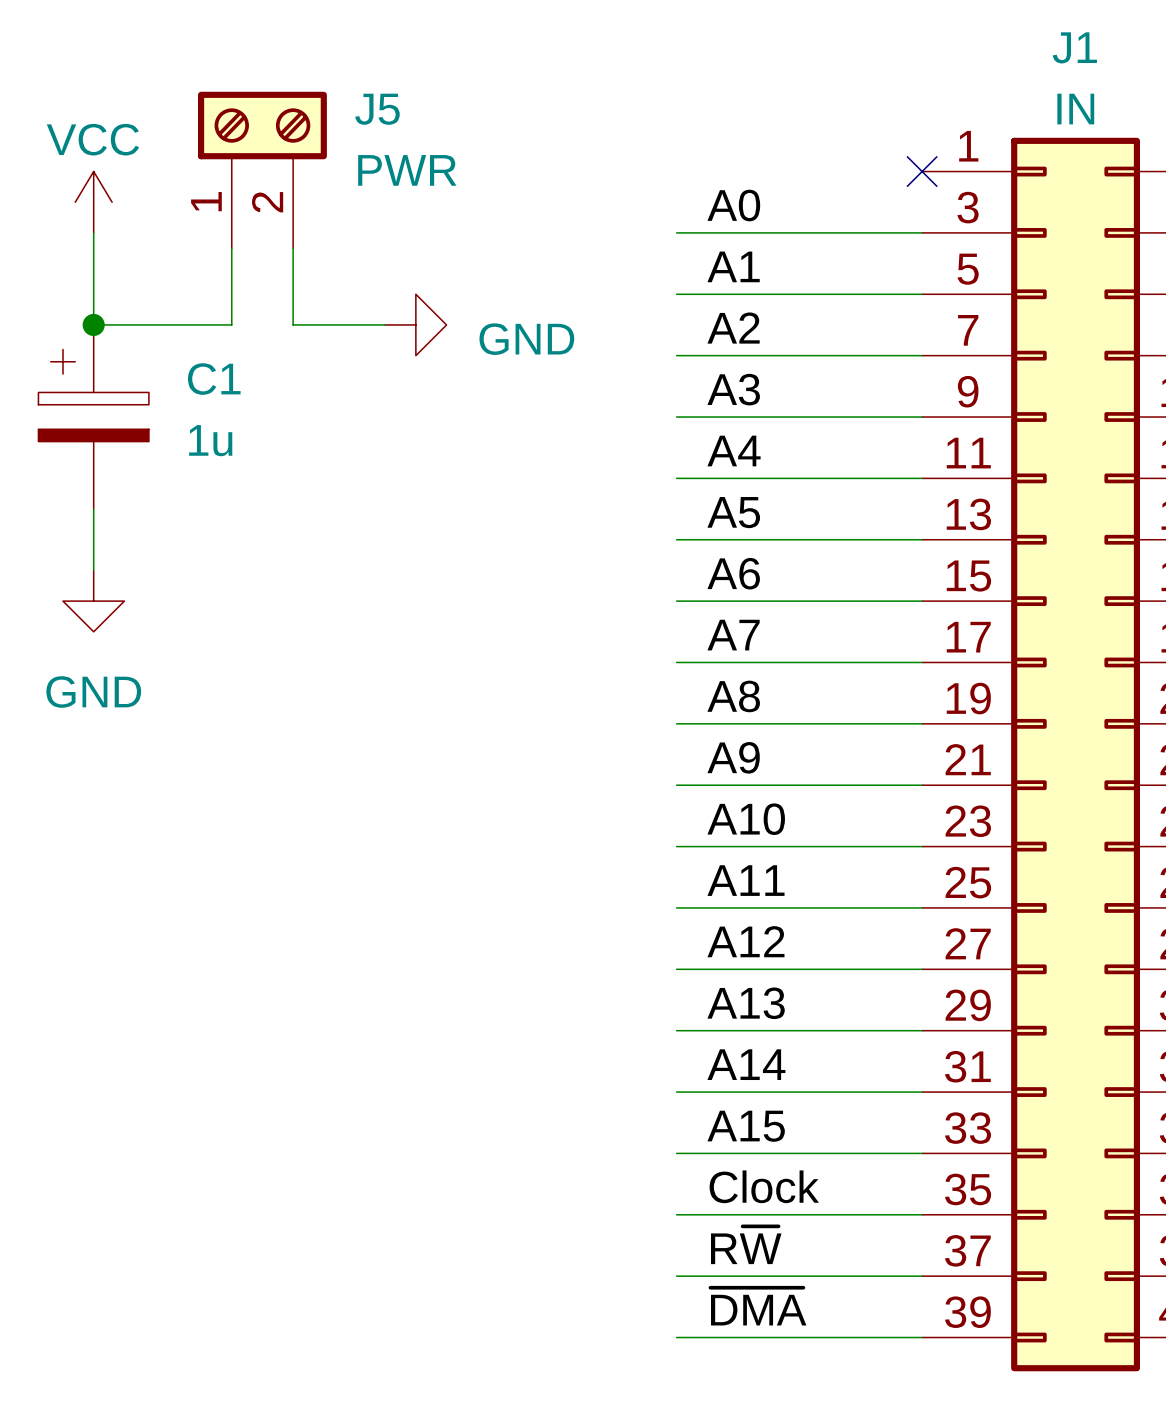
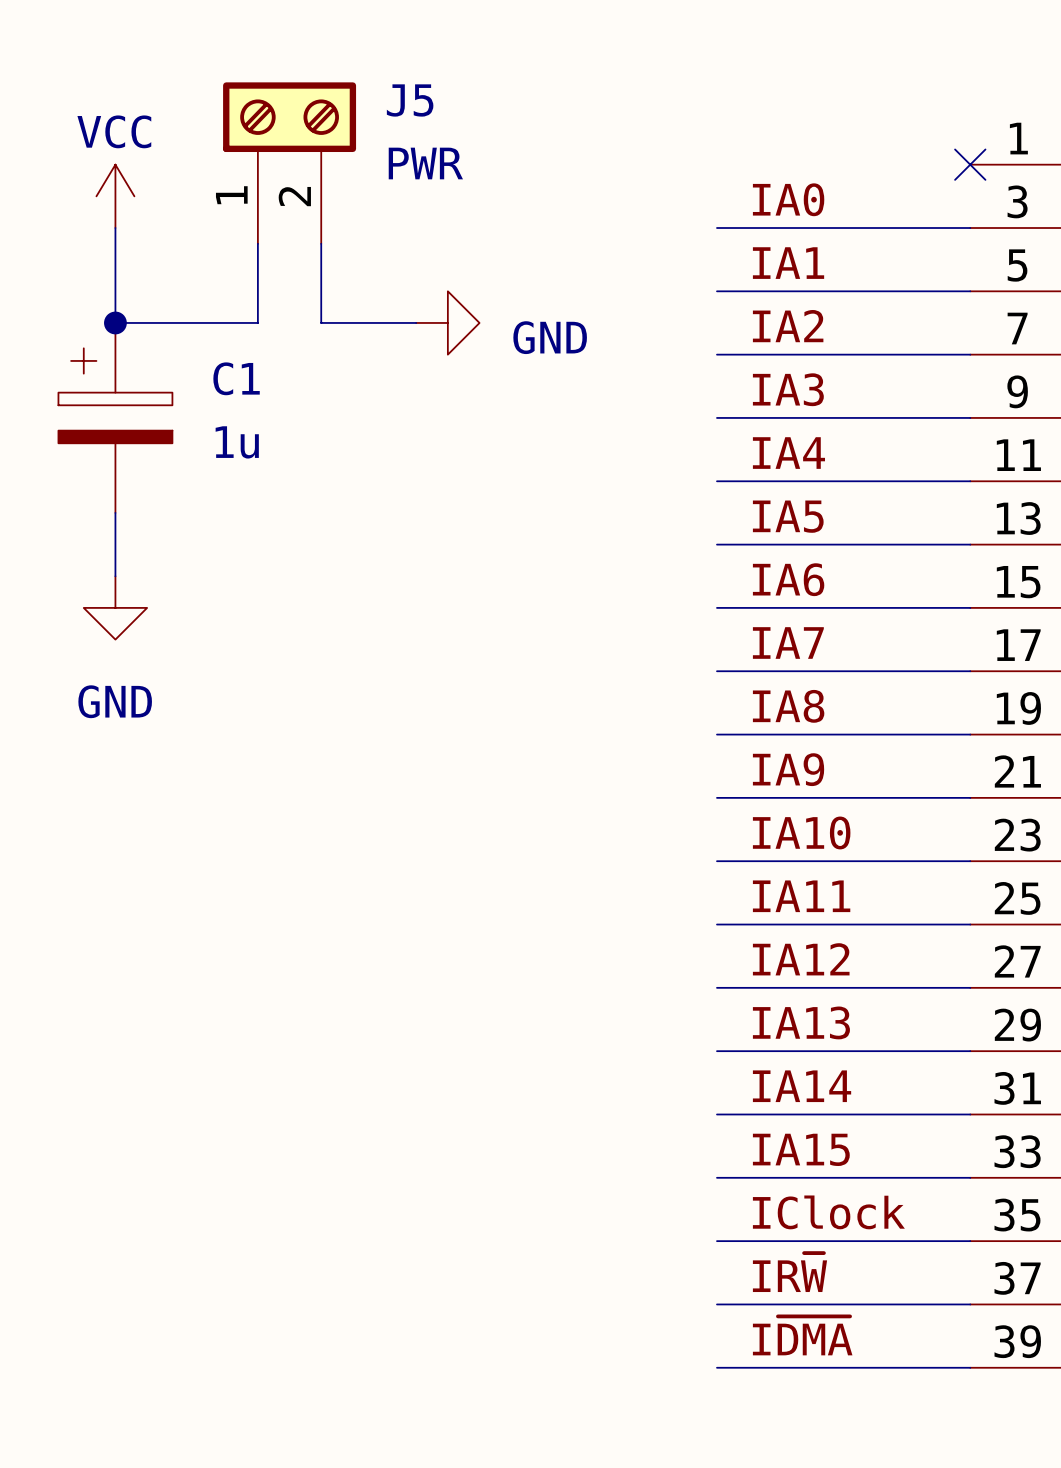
label: A0 (733, 205) -> IA0 (788, 199)
label: A1 (733, 266) -> IA1 (788, 263)
label: A2 (733, 328) -> IA2 (788, 326)
label: A3 (733, 389) -> IA3 (788, 389)
label: A4 (734, 451) -> IA4 (788, 453)
label: A5 (733, 512) -> IA5 (788, 516)
label: A6 (733, 573) -> IA6 (788, 579)
label: A7 (733, 635) -> IA7 (788, 642)
label: A8 (733, 696) -> IA8 (788, 706)
label: A9 (733, 757) -> IA9 (788, 769)
label: A10 (746, 819) -> IA10 (801, 832)
label: A11 (745, 880) -> IA11 (801, 896)
label: A12 (745, 941) -> IA12 (801, 959)
label: A13 (746, 1003) -> IA13 (801, 1022)
label: A14 (746, 1064) -> IA14 (802, 1086)
label: A15 (746, 1126) -> IA15 (801, 1149)
label: Clock (764, 1186) -> IClock (828, 1212)
label: R~{W} (746, 1245) -> IR~{W} (789, 1272)
label: ~{DMA} (758, 1306) -> I~{DMA} (802, 1335)

